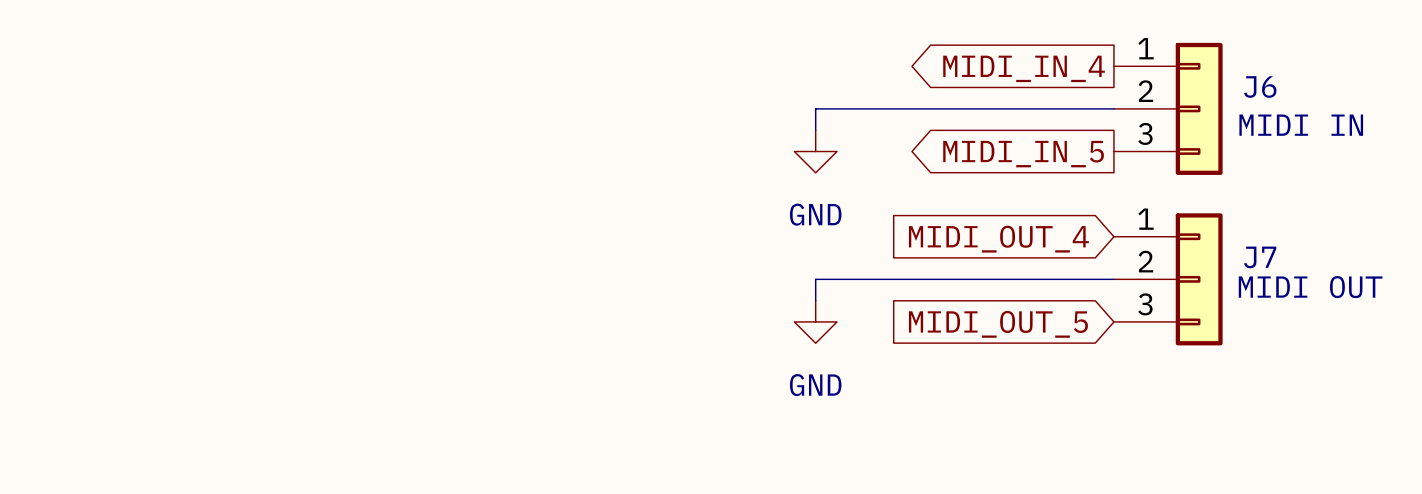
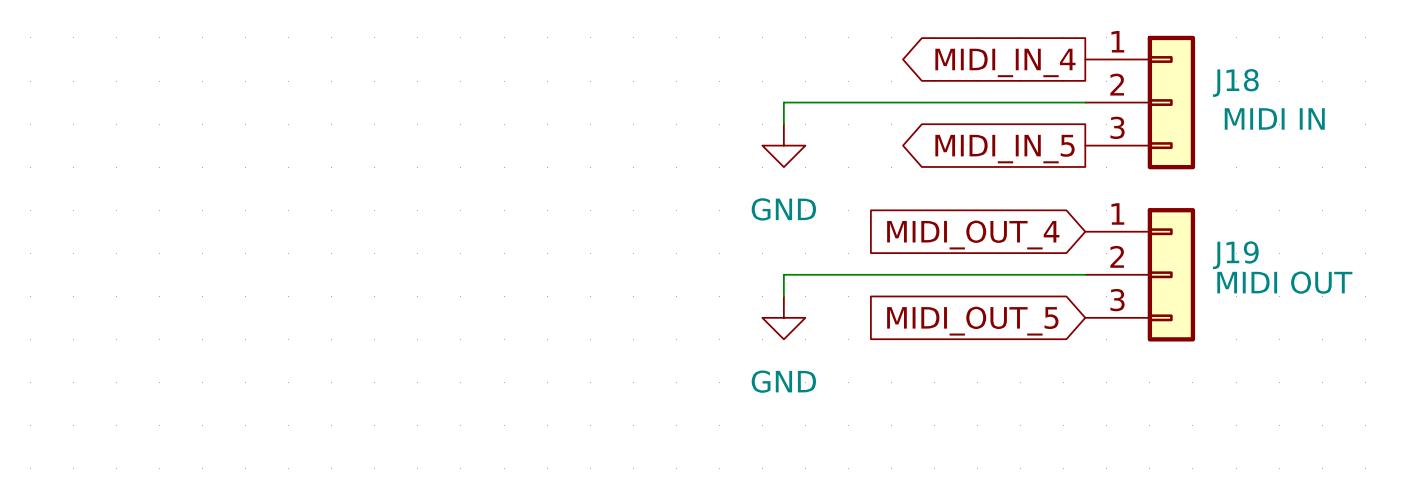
J6 name: J6 (1260, 86) -> J18 (1235, 82)
J7 name: J7 (1260, 257) -> J19 (1235, 255)

